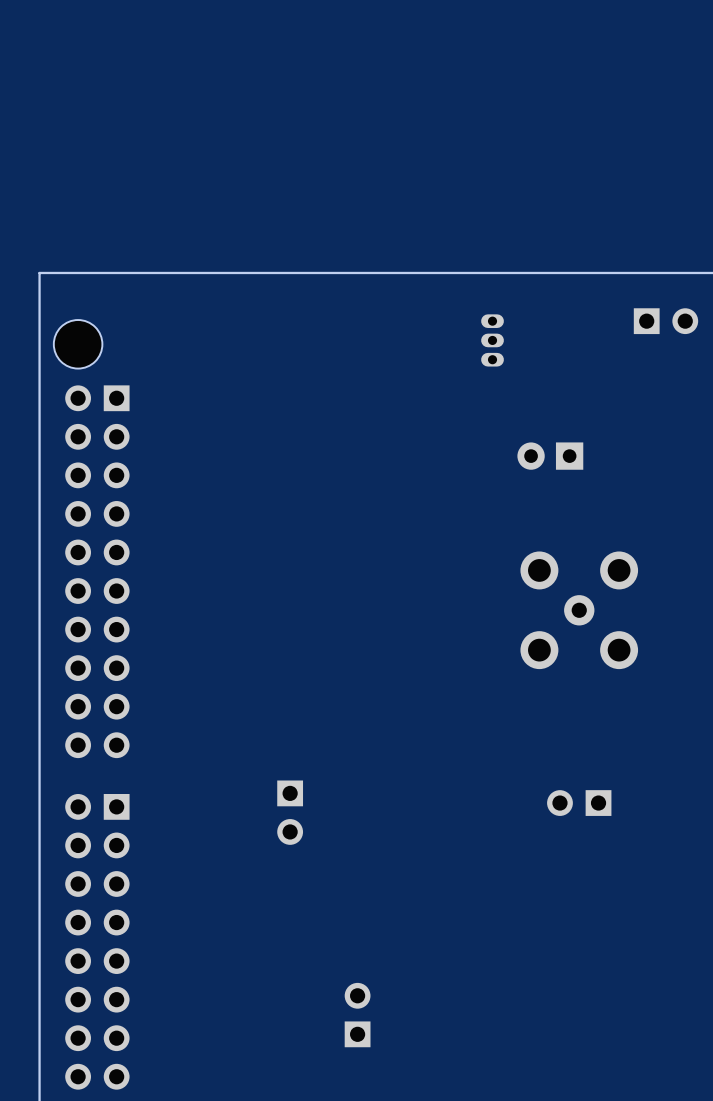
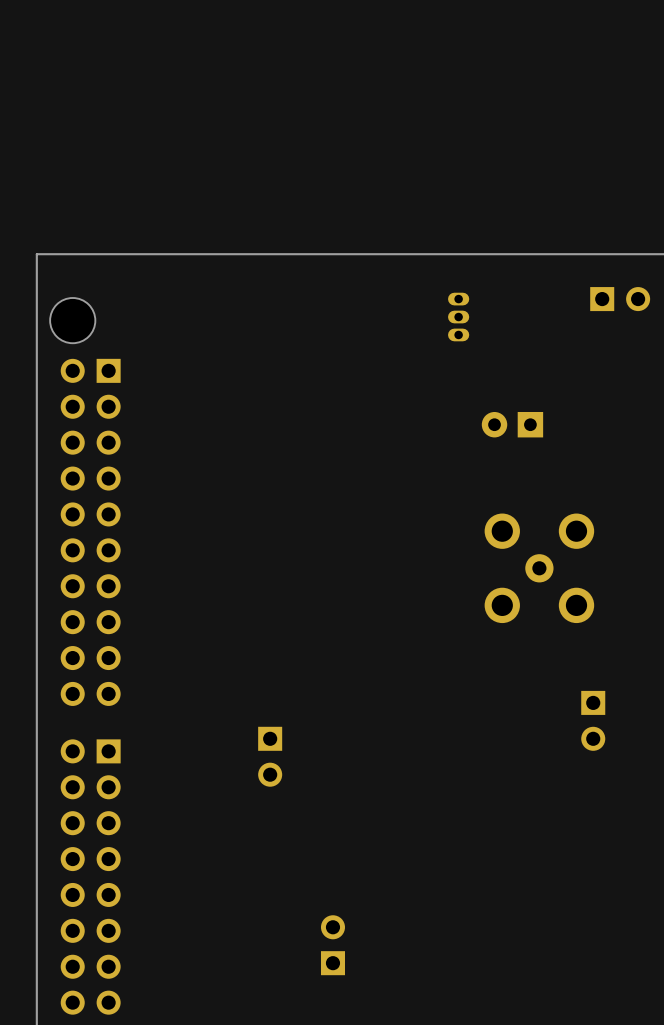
part rotation: 0° (579, 803) -> 90° counterclockwise (593, 720)
part position: (579, 803) -> (593, 720)

